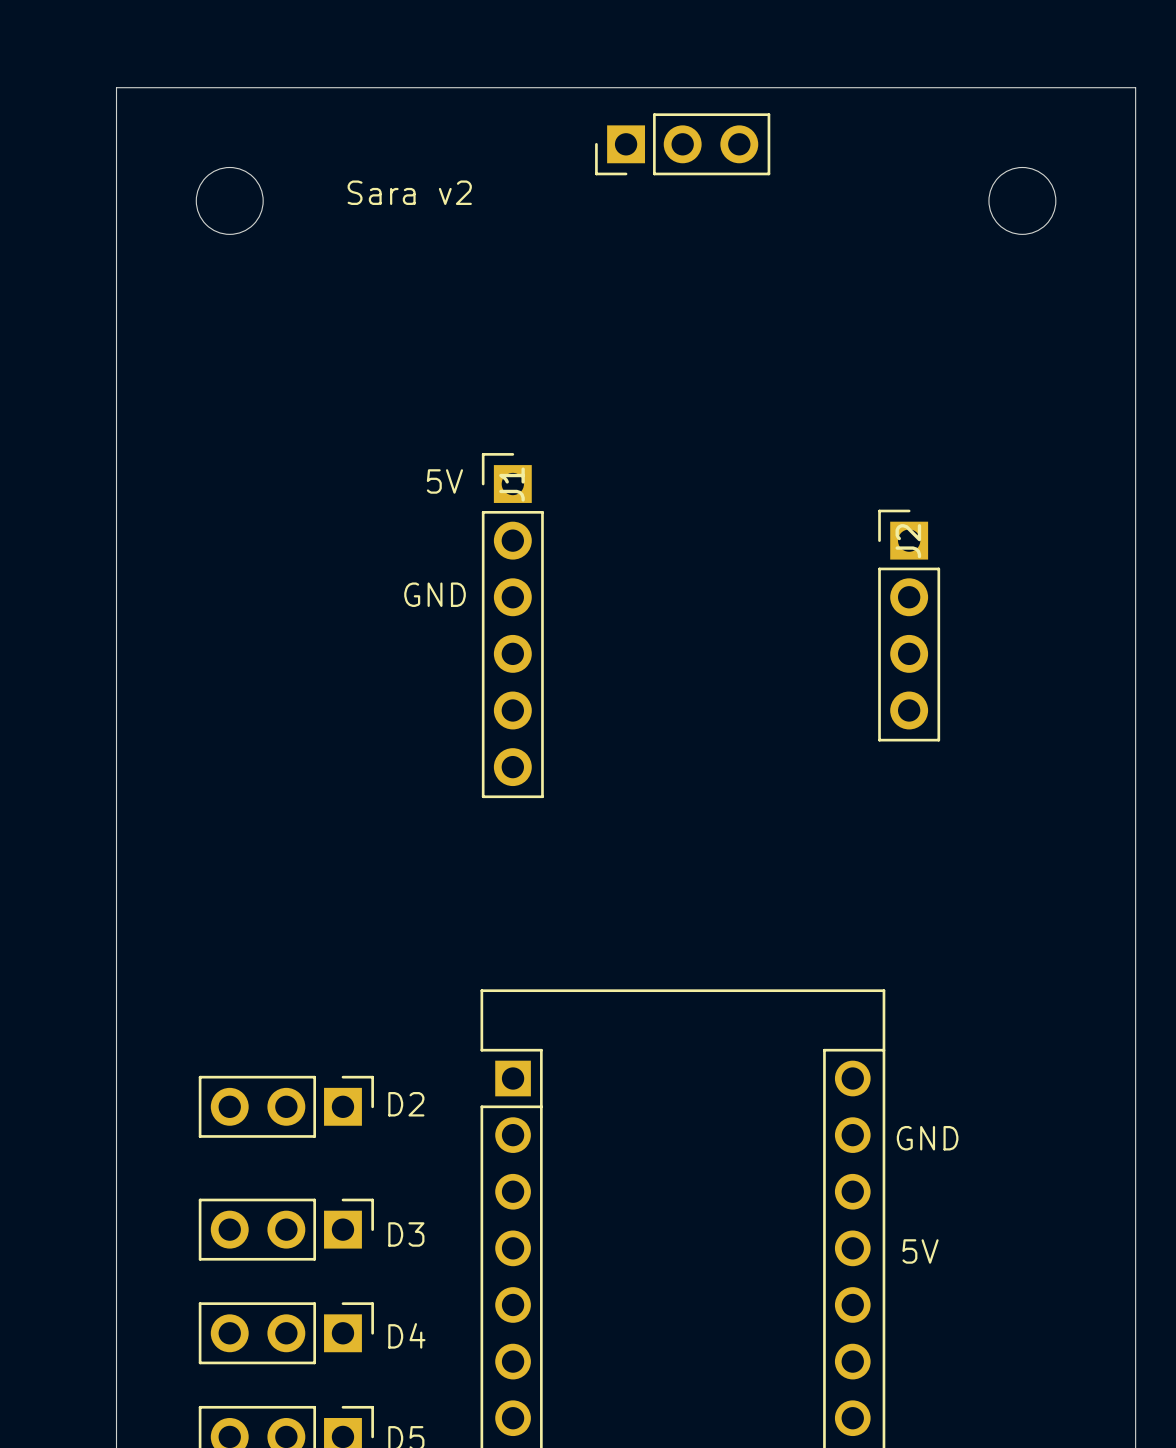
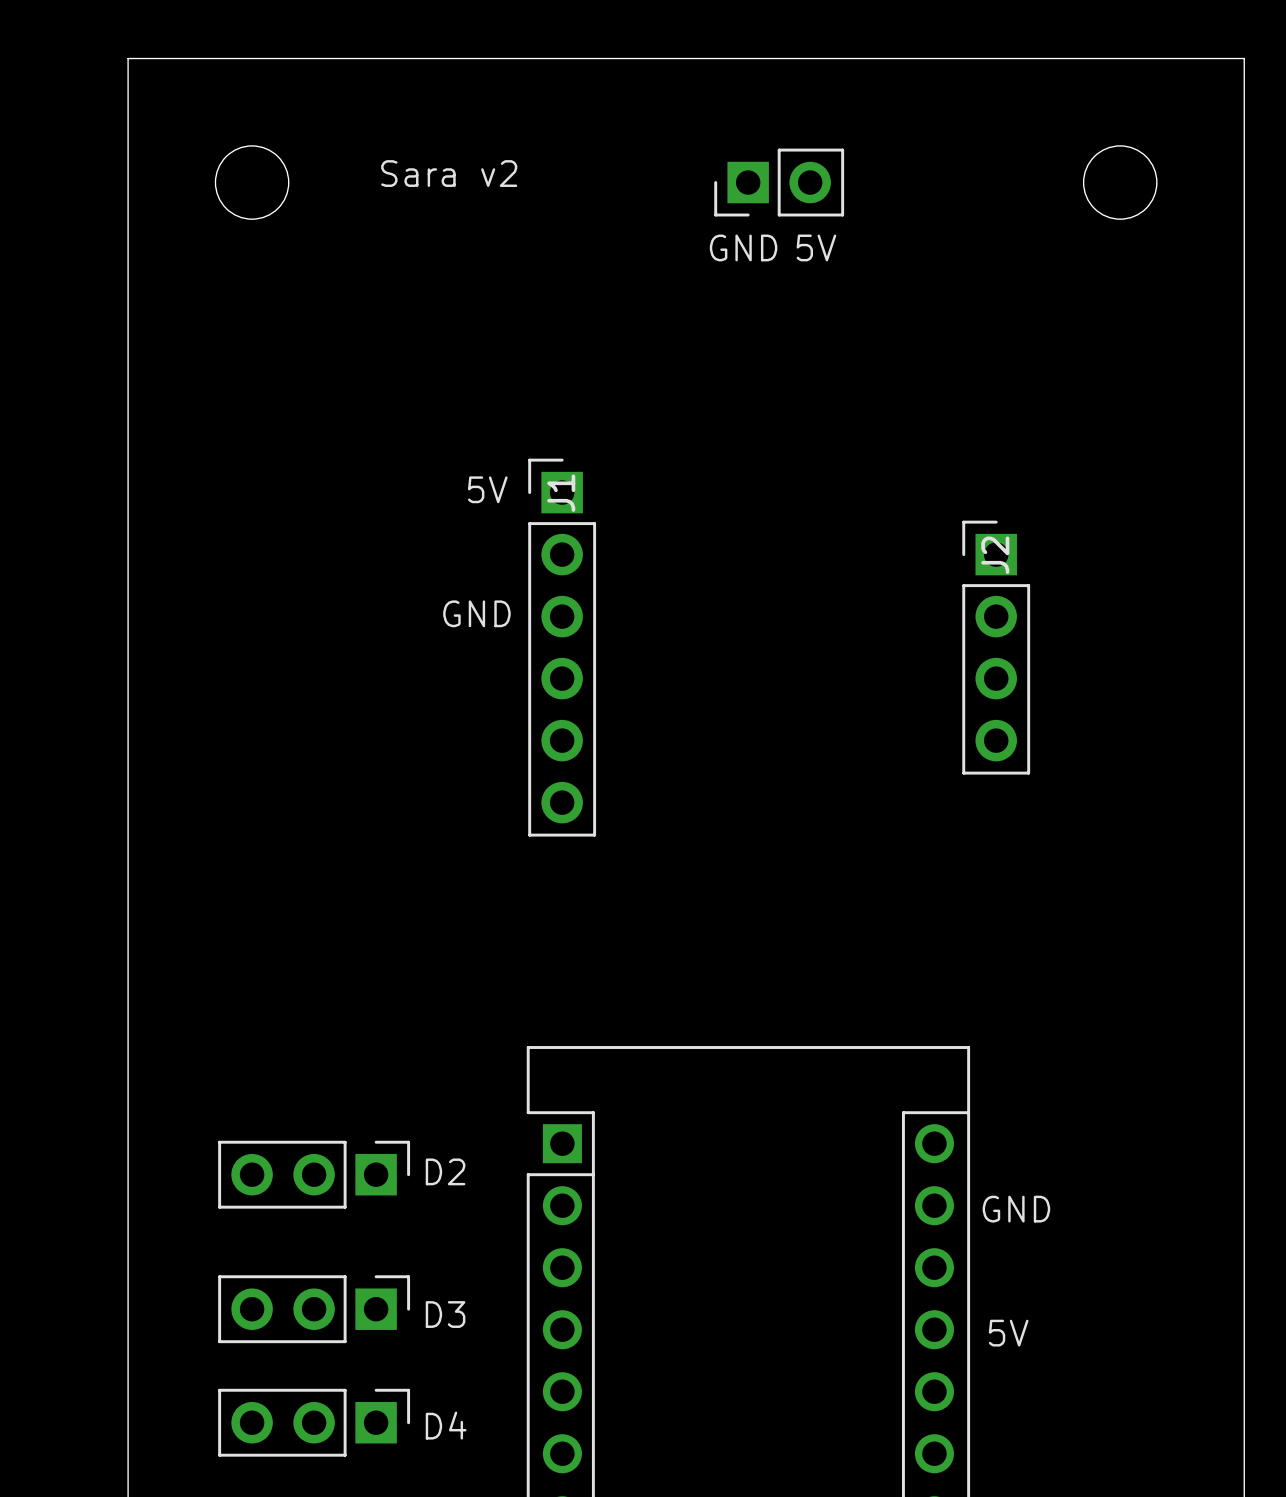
part: (682, 144) -> none
part: none -> (779, 182)
text: none -> GND (743, 247)
text: none -> 5V (816, 247)

